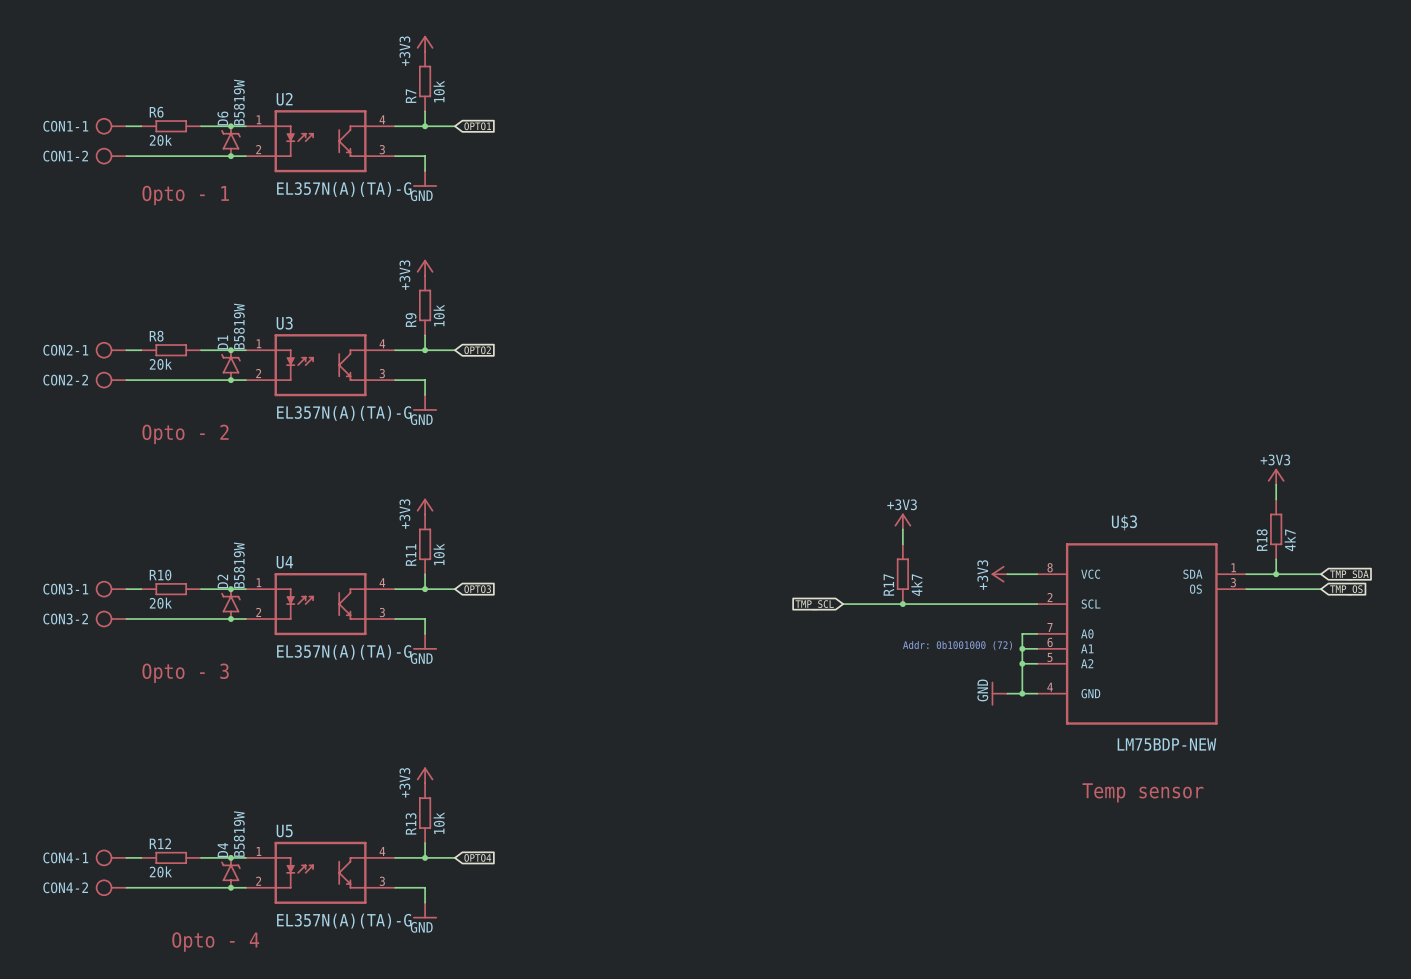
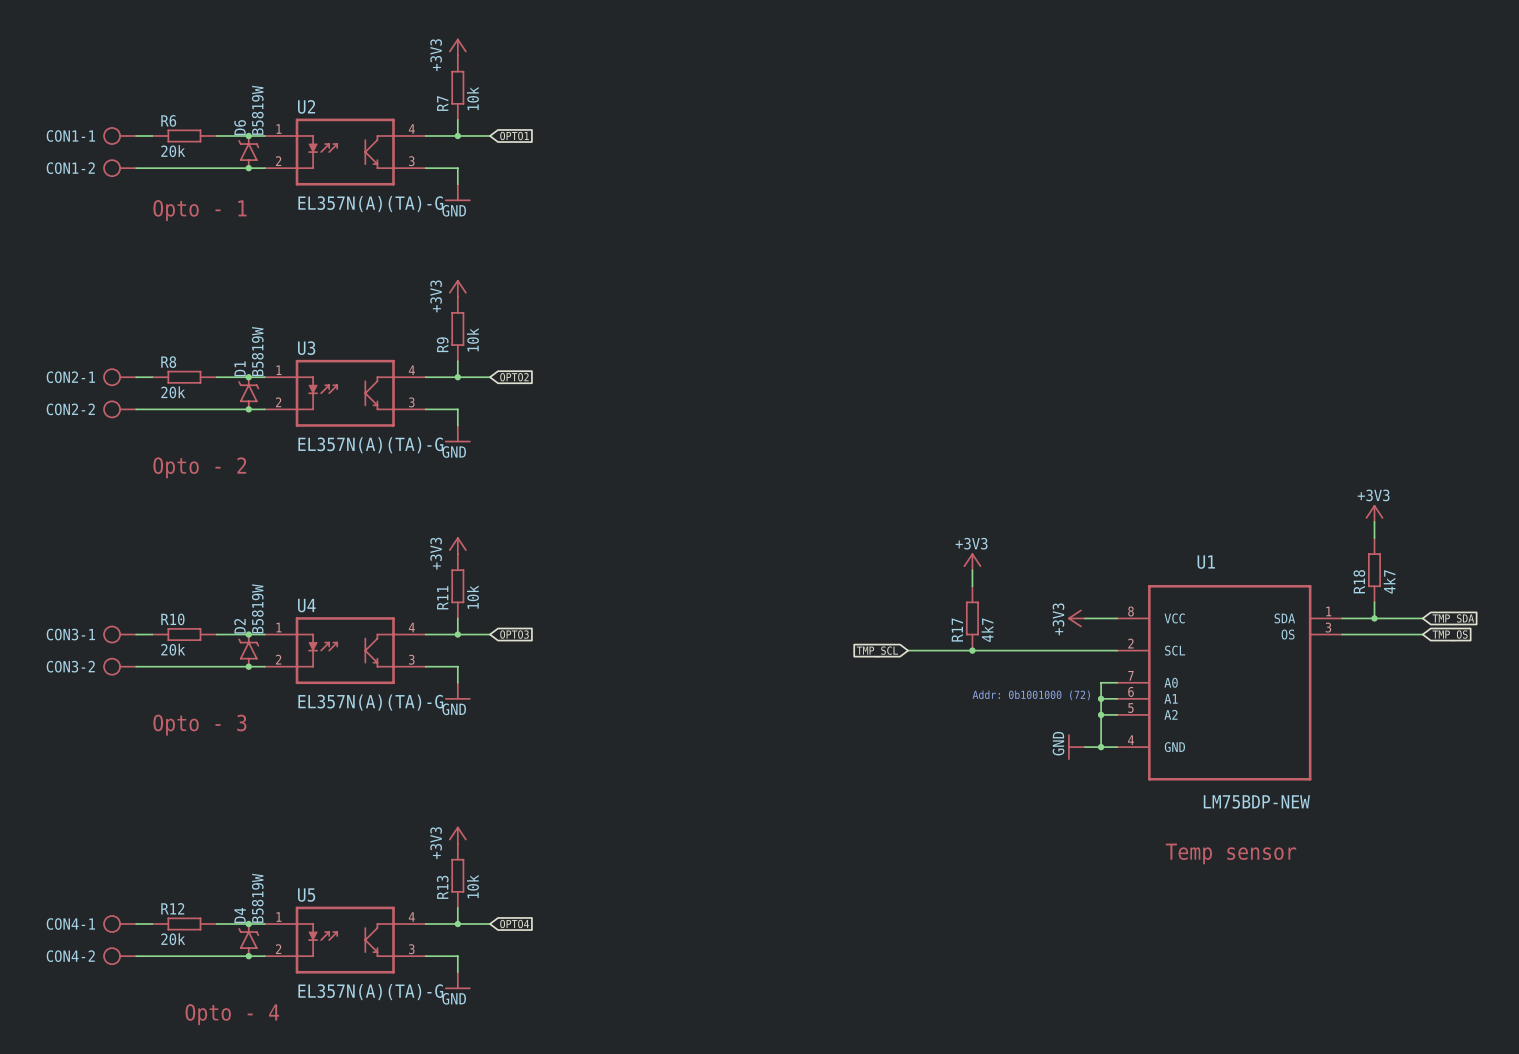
U$3 name: U$3 (1124, 522) -> U1 (1206, 562)

